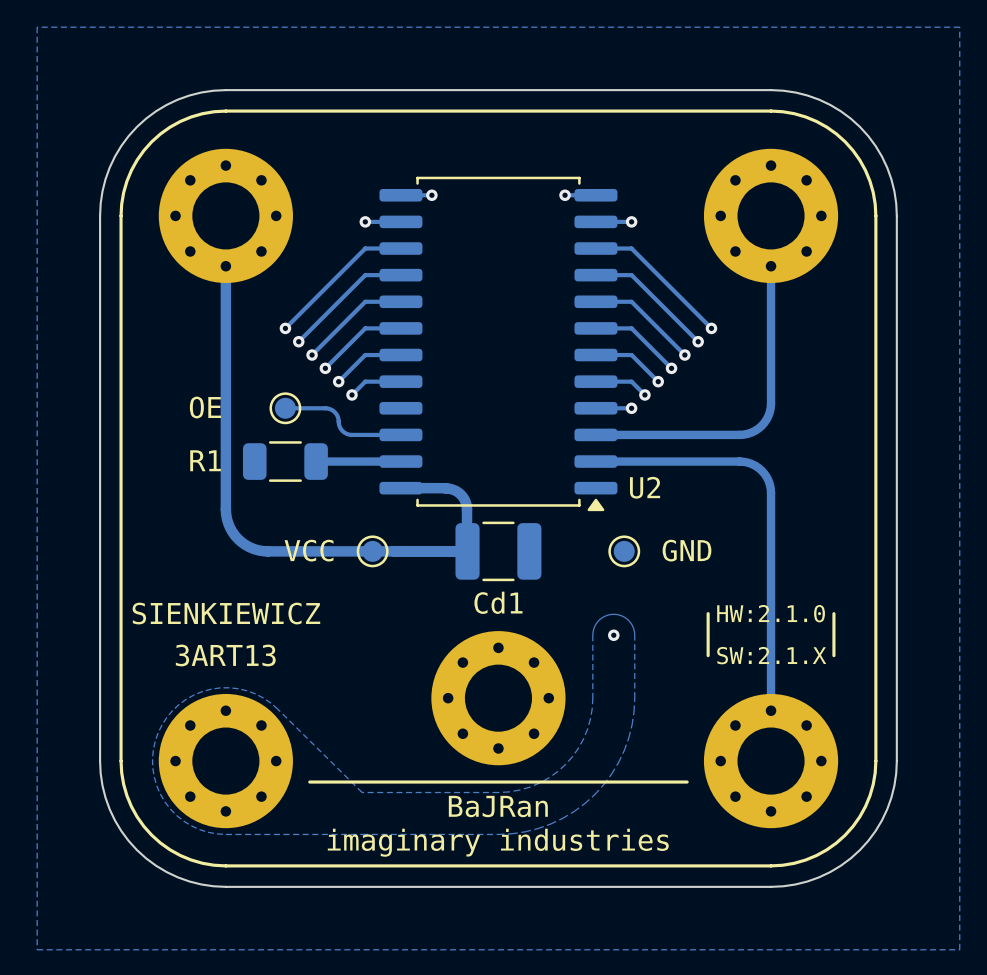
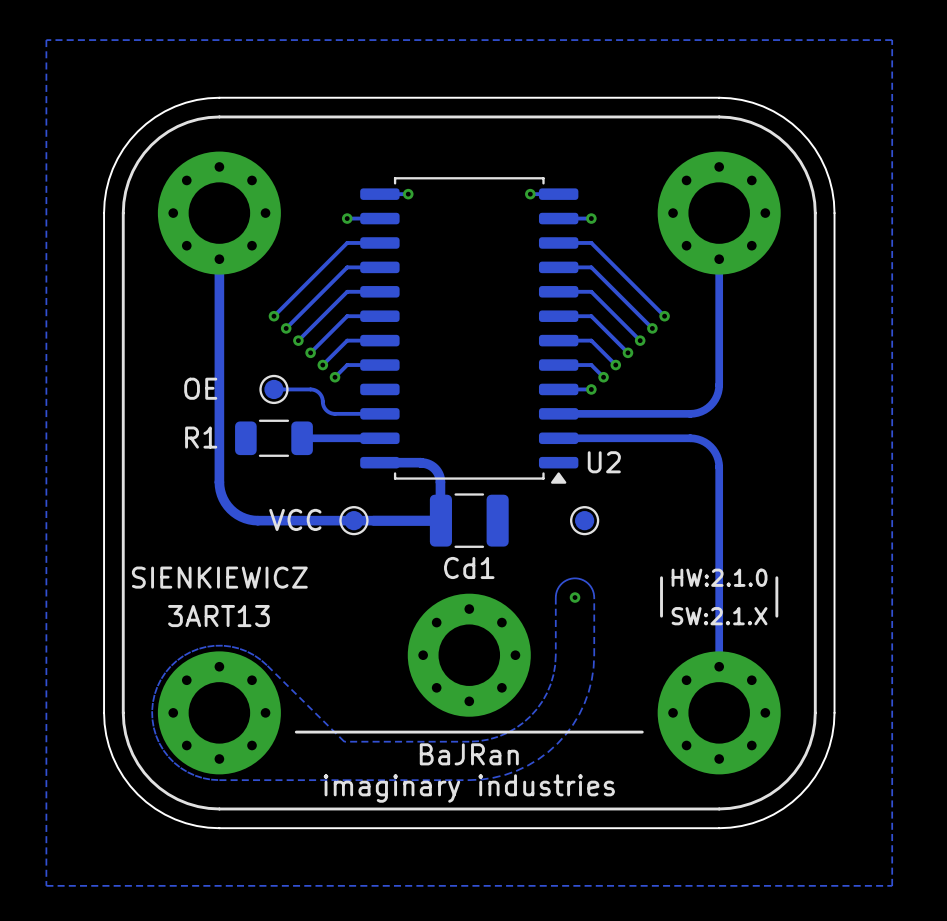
part value: GND (686, 550) -> none

